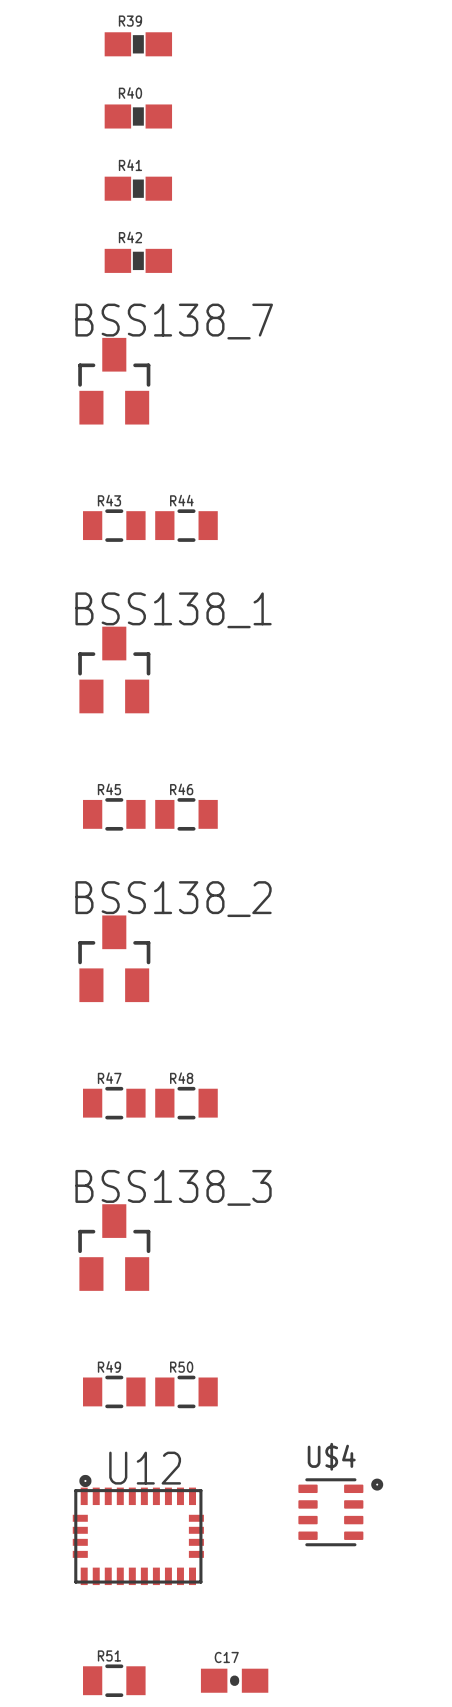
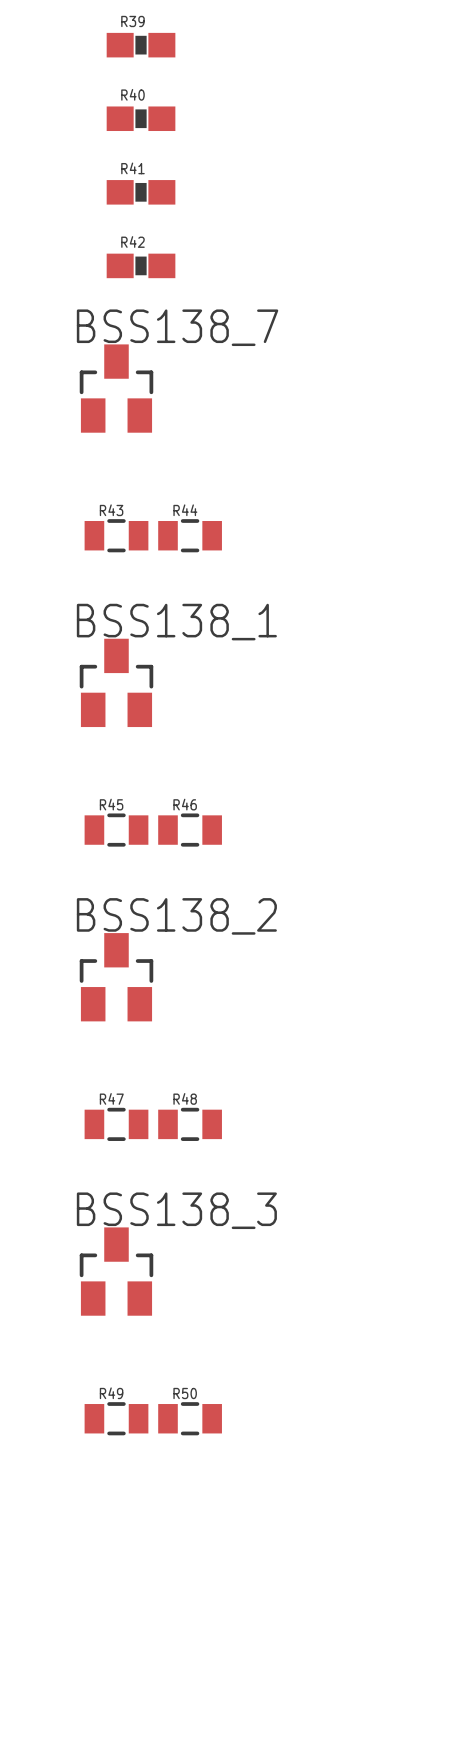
U$4: (340, 1512) -> none
U12: (138, 1529) -> none
R51: (114, 1680) -> none
C17: (234, 1680) -> none

